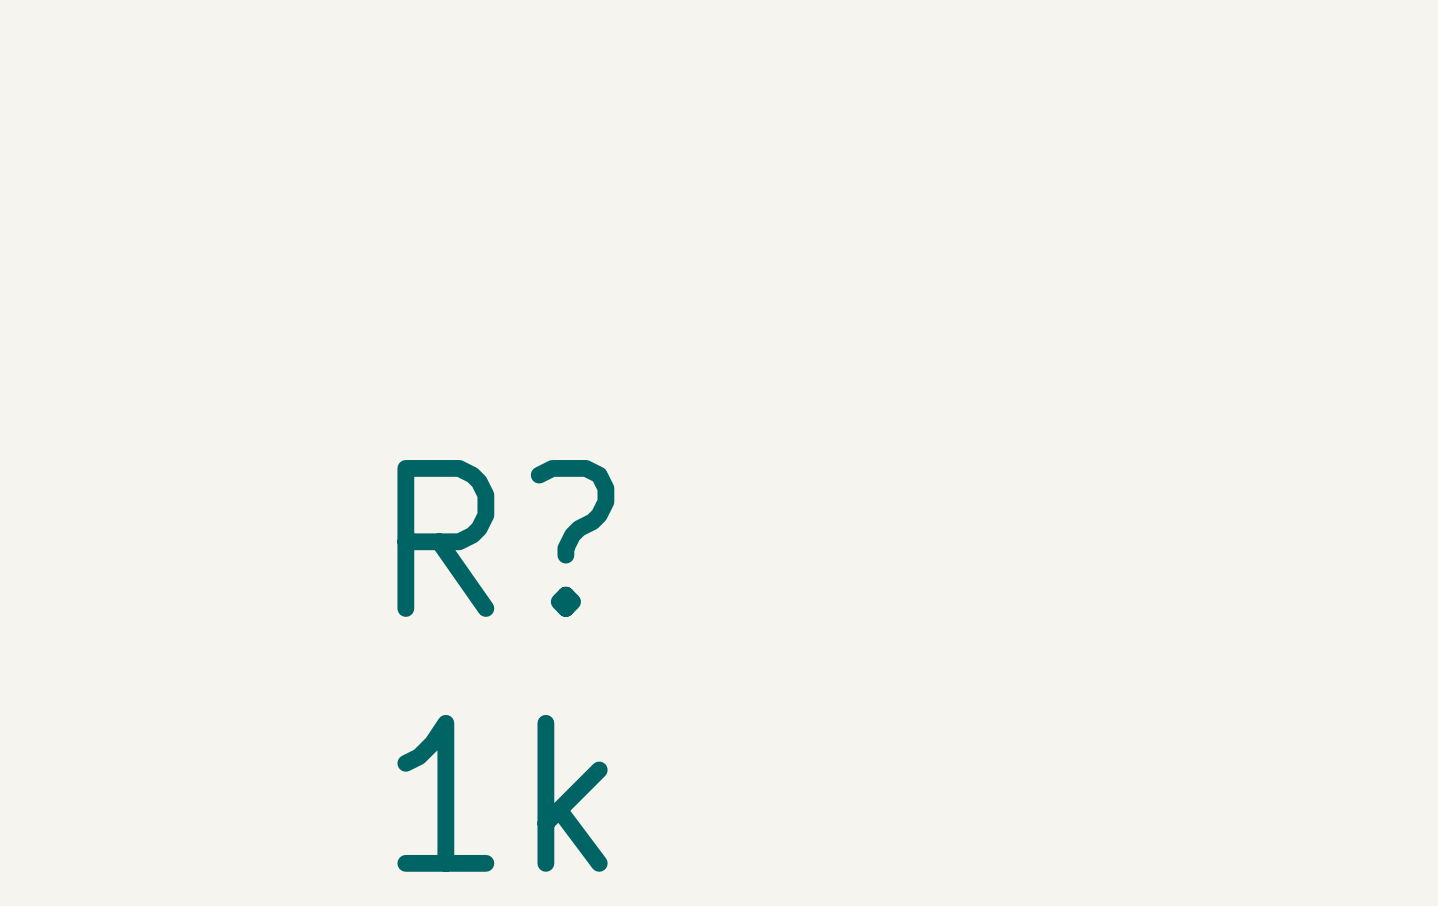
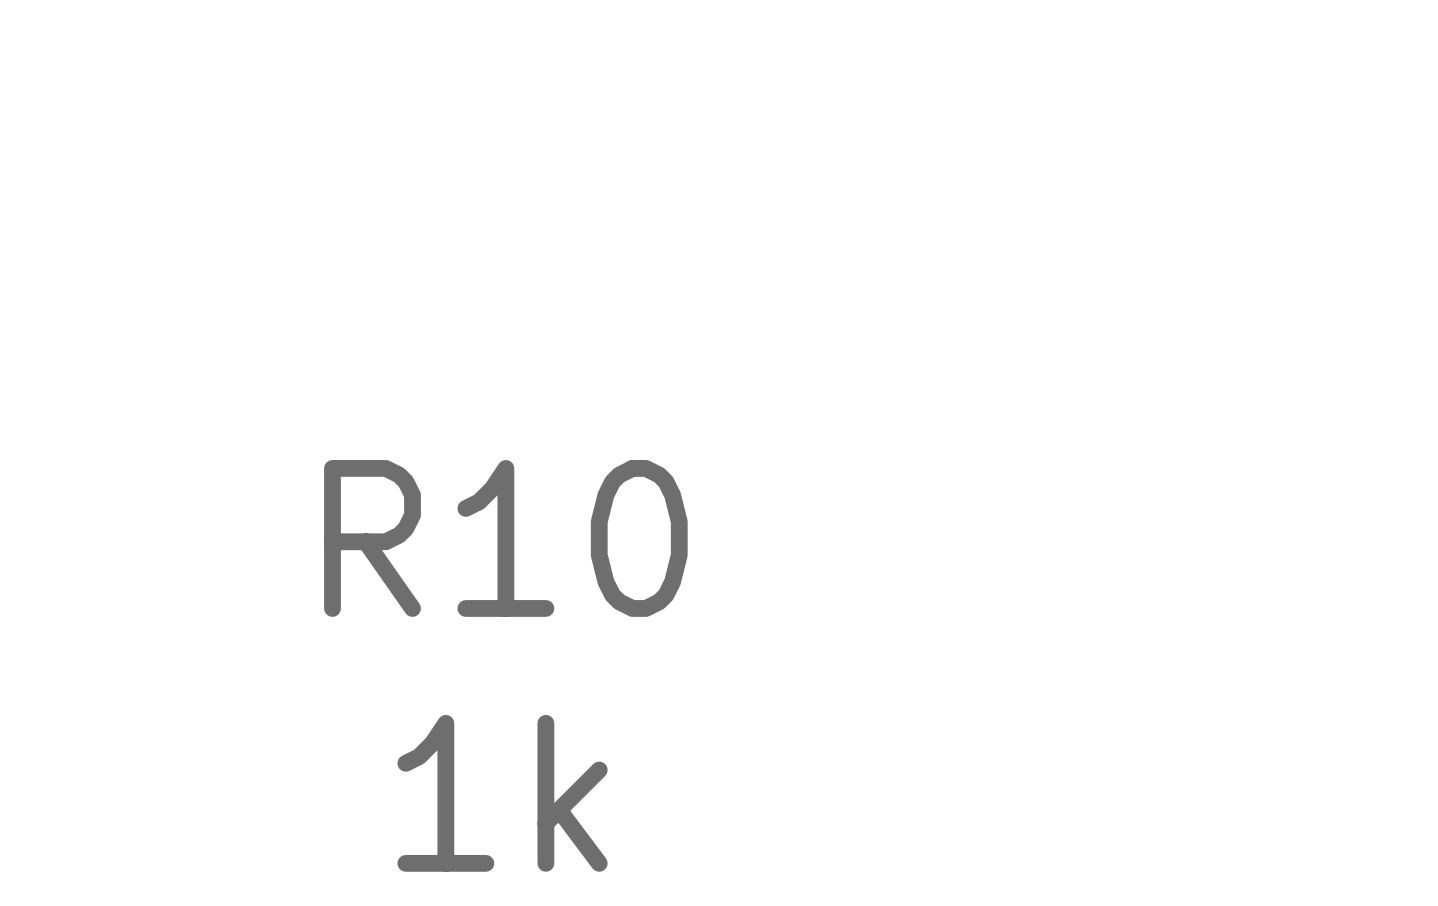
R? name: R? (505, 538) -> R10 (505, 538)

